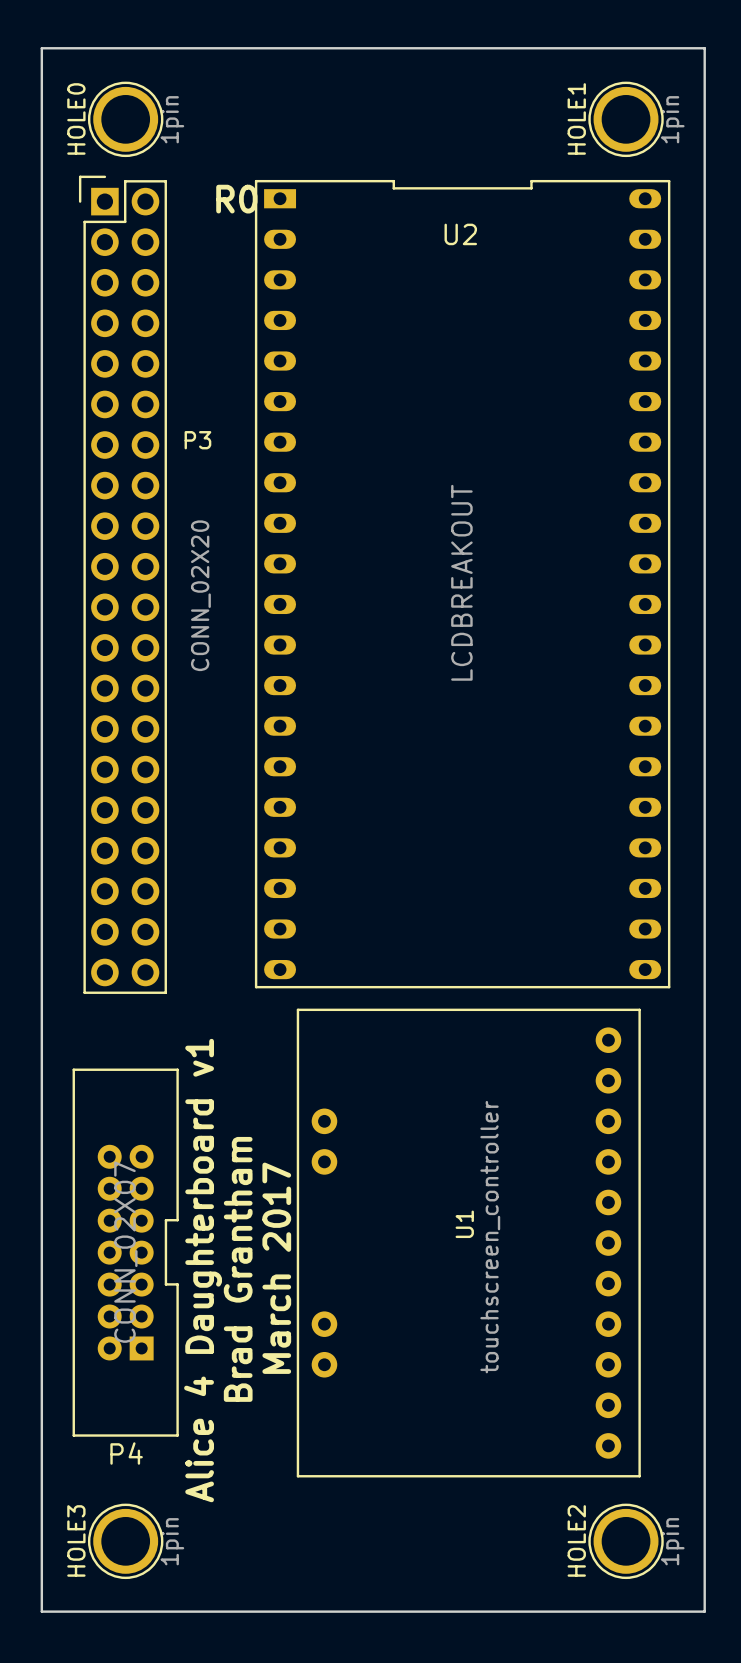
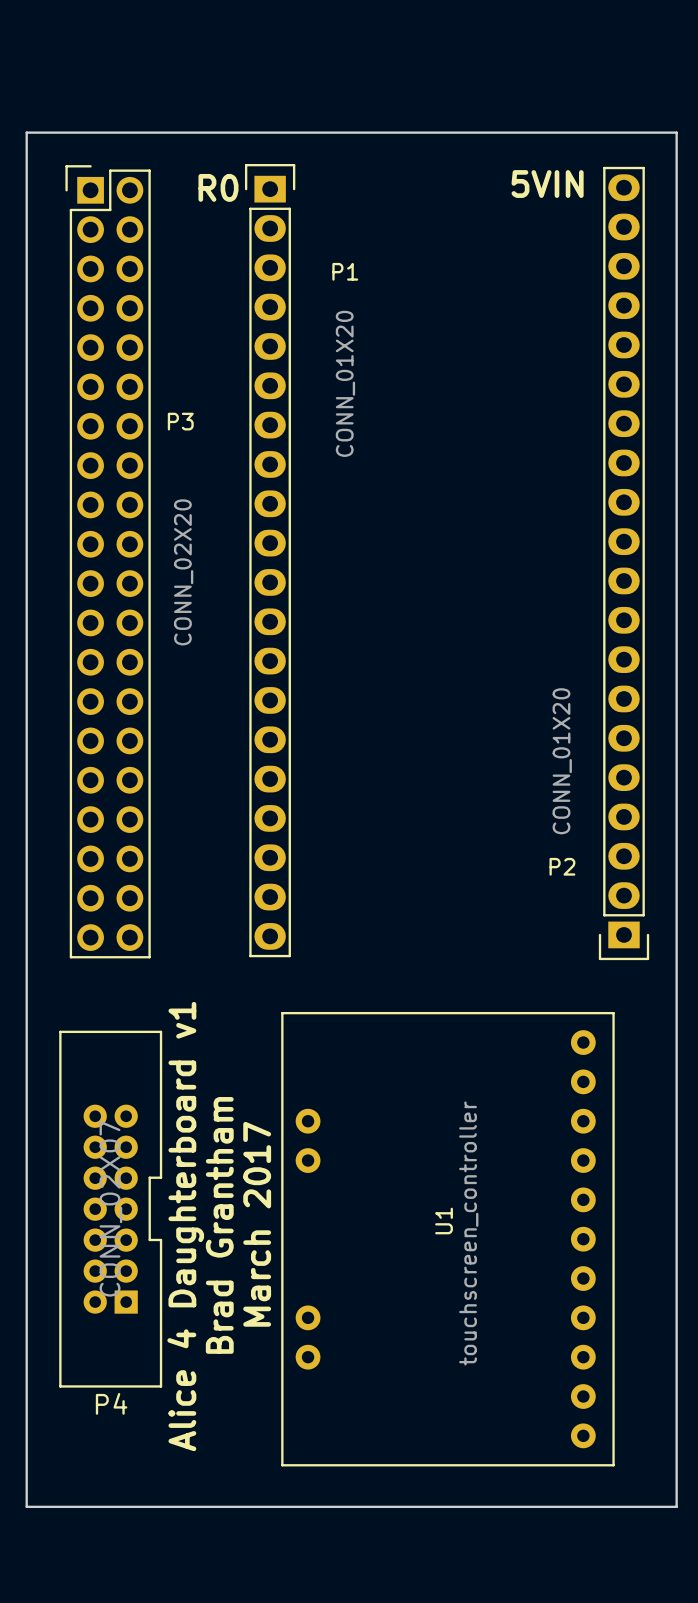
board edge: (41, 48) (41, 1611) (704, 1611) (704, 48) (41, 48) -> (26, 132) (676, 132) (676, 1506) (26, 1506) (26, 132)
HOLE0: 1pin (125, 119) -> none
HOLE1: 1pin (626, 119) -> none
text: none -> 5VIN (547, 184)
P1: none -> CONN_01X20 (270, 560)
U2: LCDBREAKOUT (462, 584) -> none
P2: none -> CONN_01X20 (624, 563)
U1 position: (468, 1243) -> (447, 1239)
HOLE3: 1pin (125, 1541) -> none
HOLE2: 1pin (626, 1541) -> none

